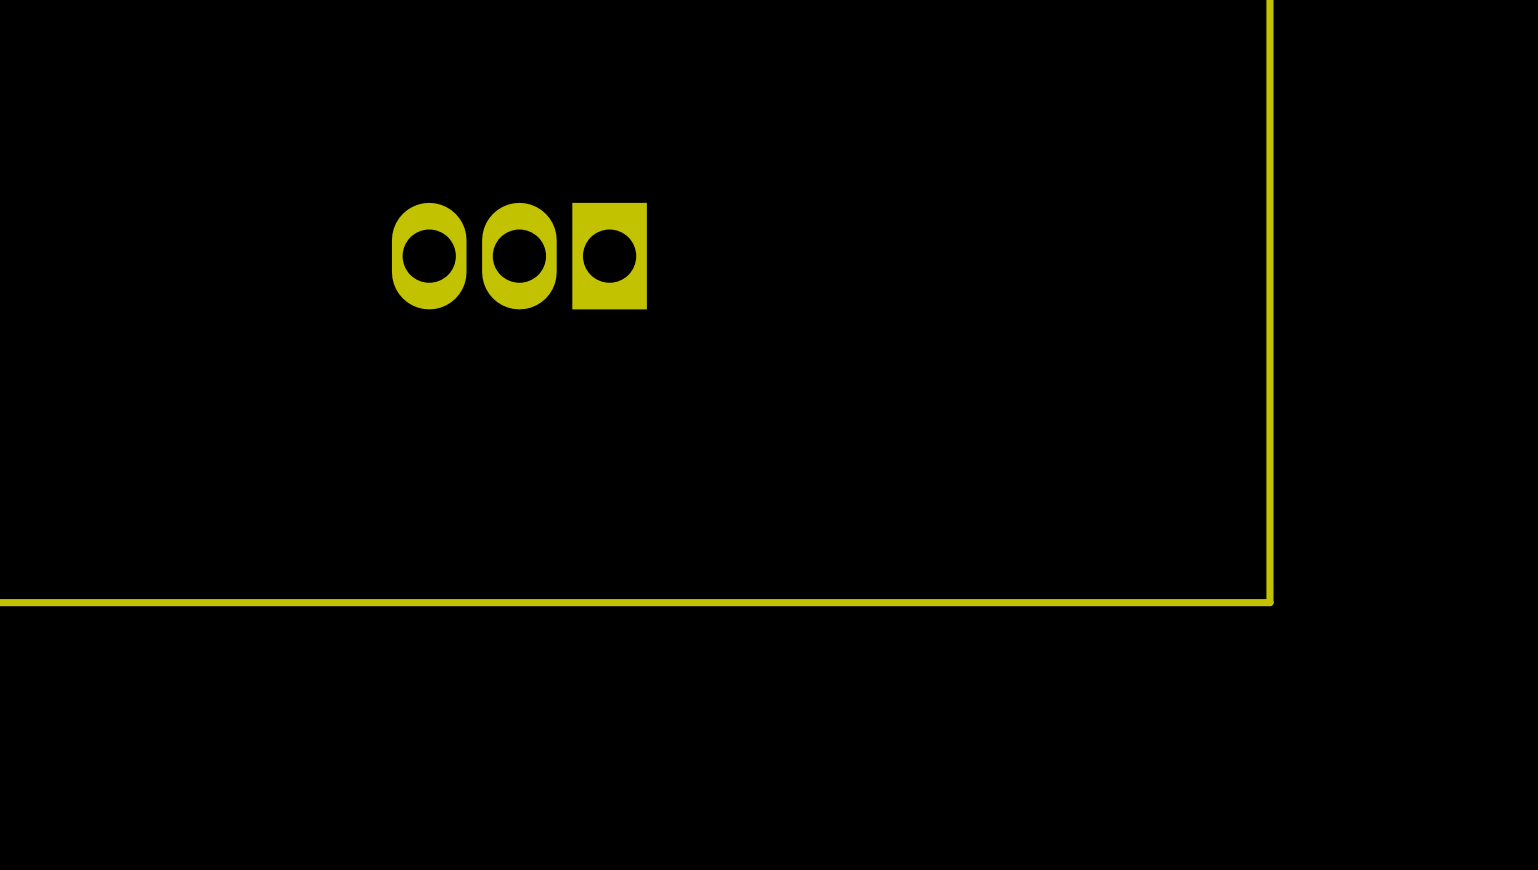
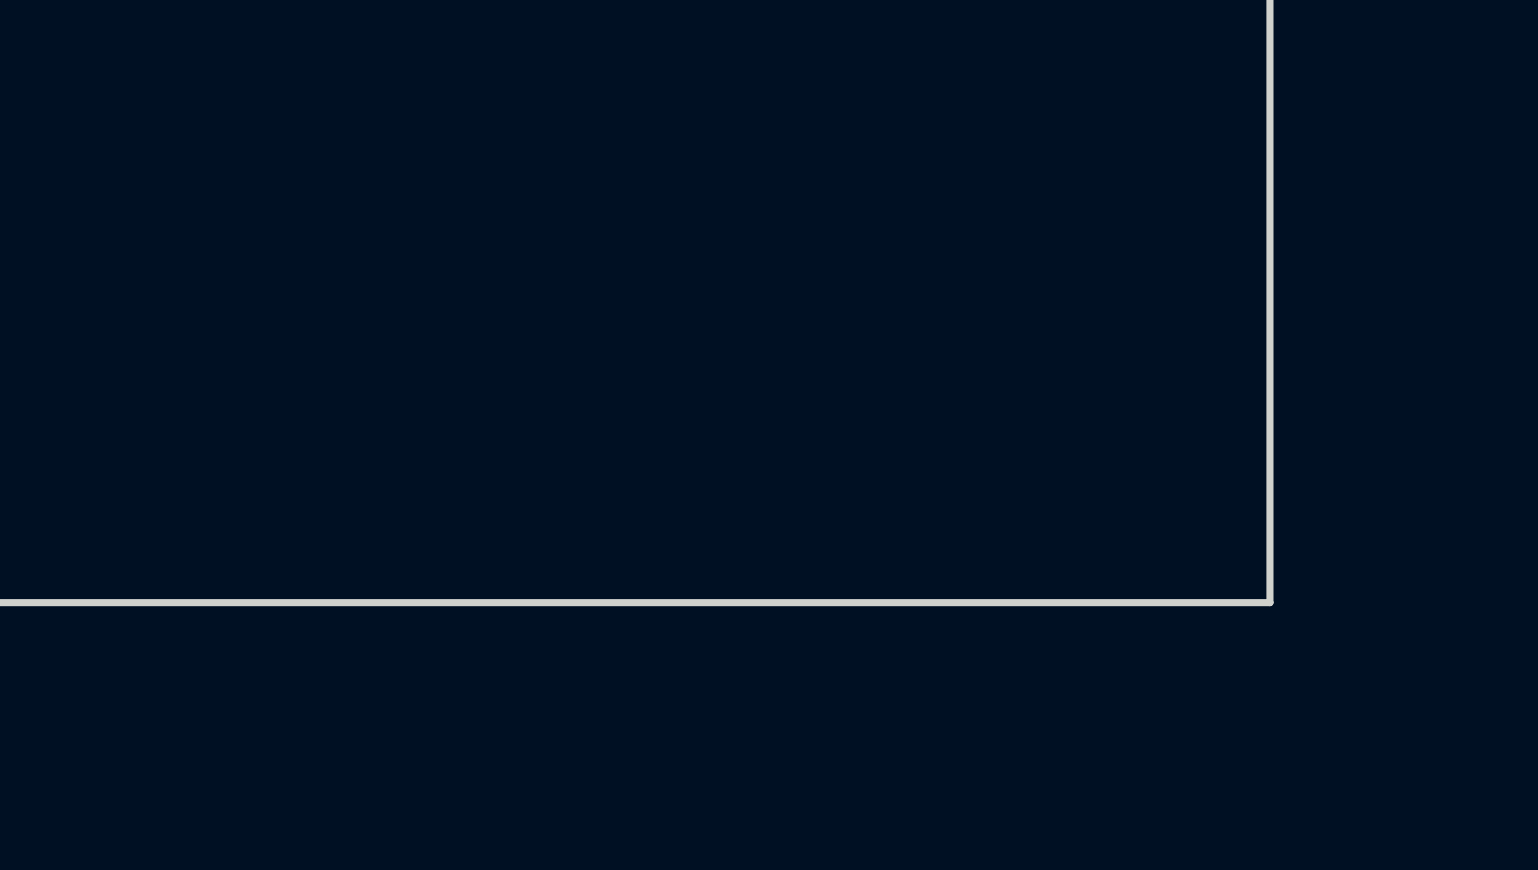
part: (519, 256) -> none

